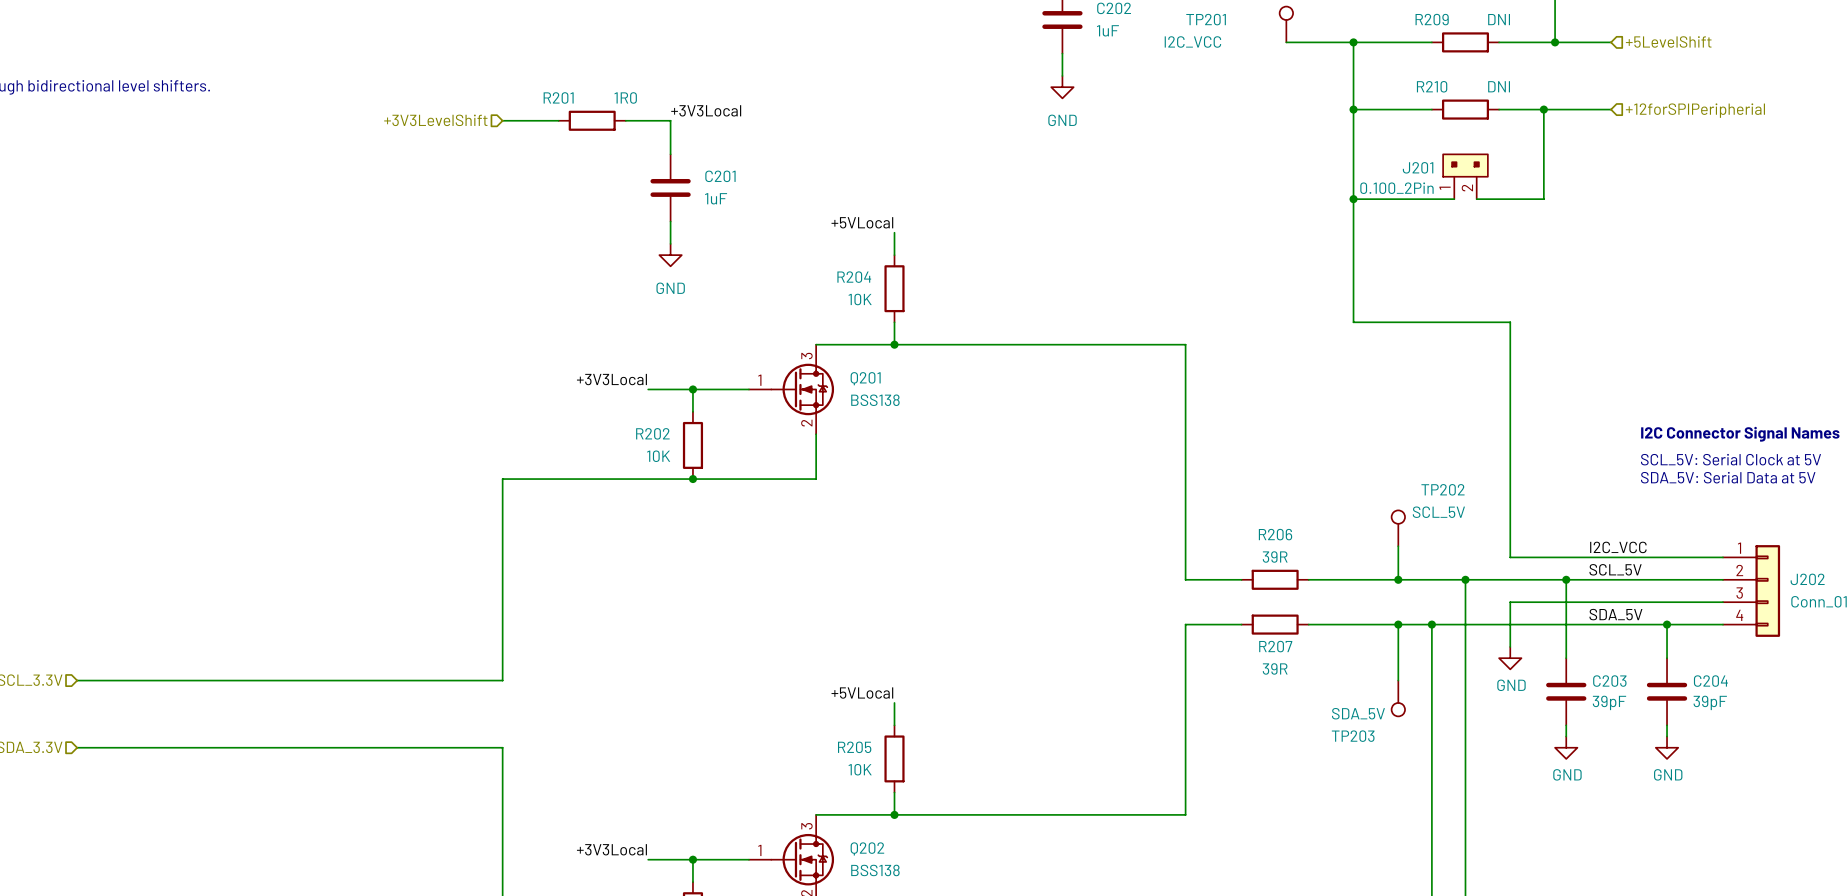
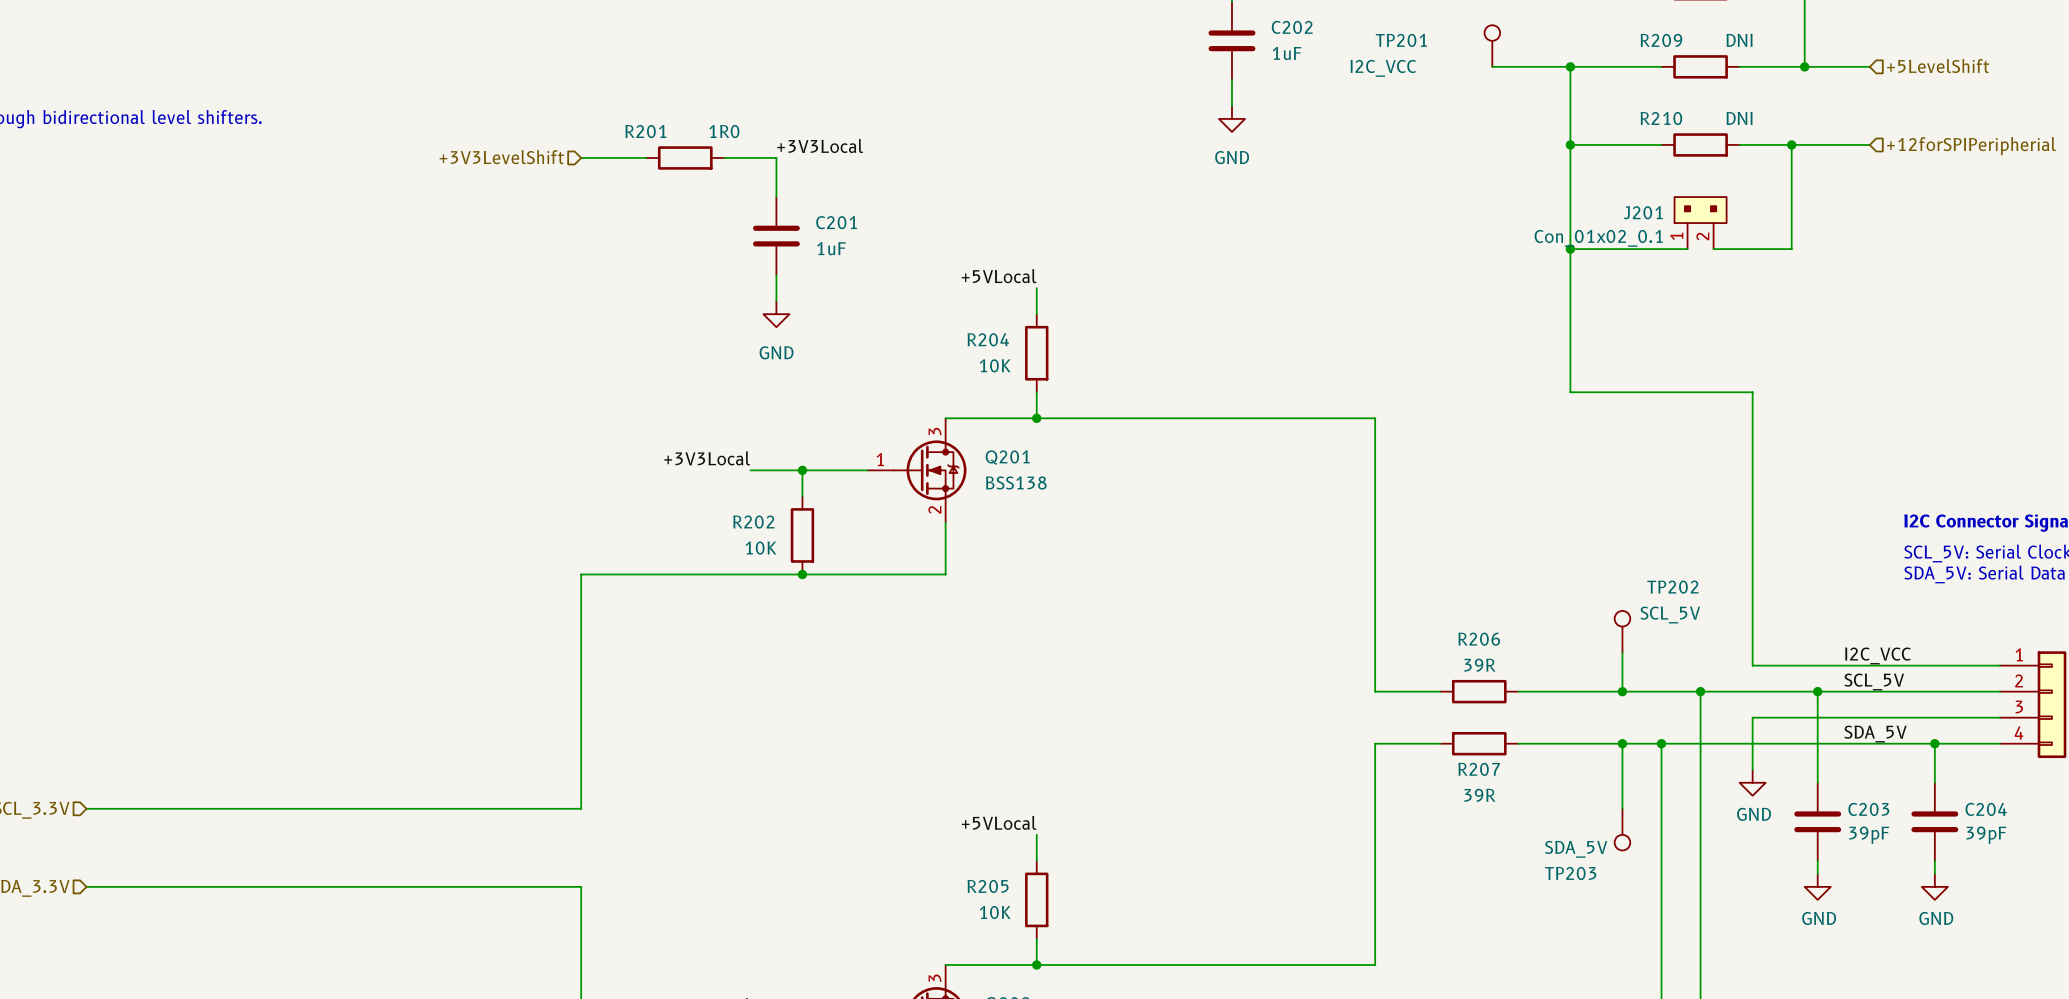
J201 value: 0.100_2Pin (1396, 188) -> Con_01x02_0.1 (1598, 238)

